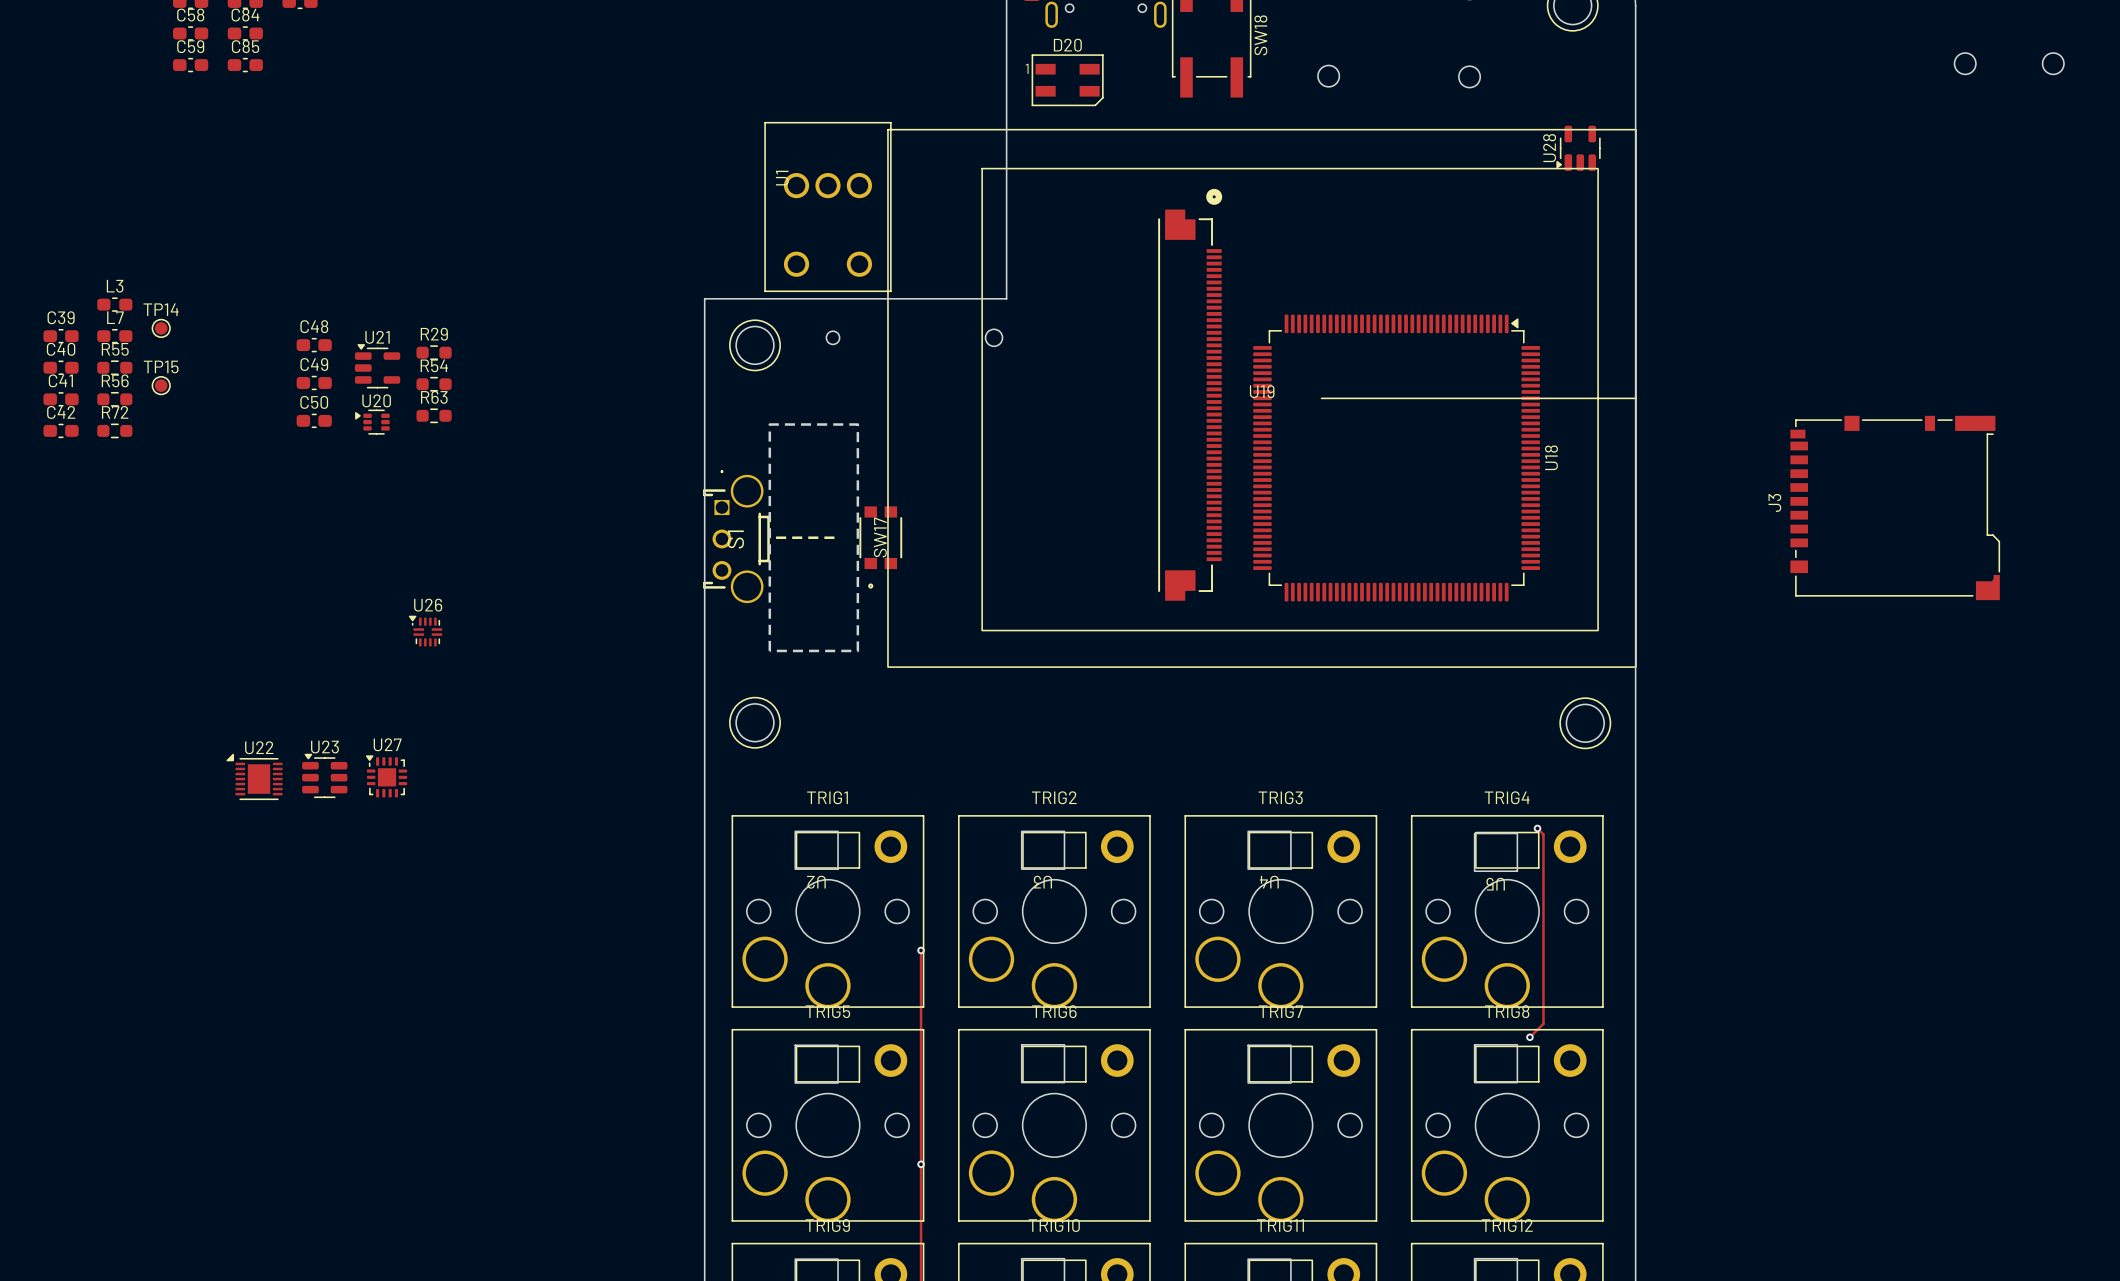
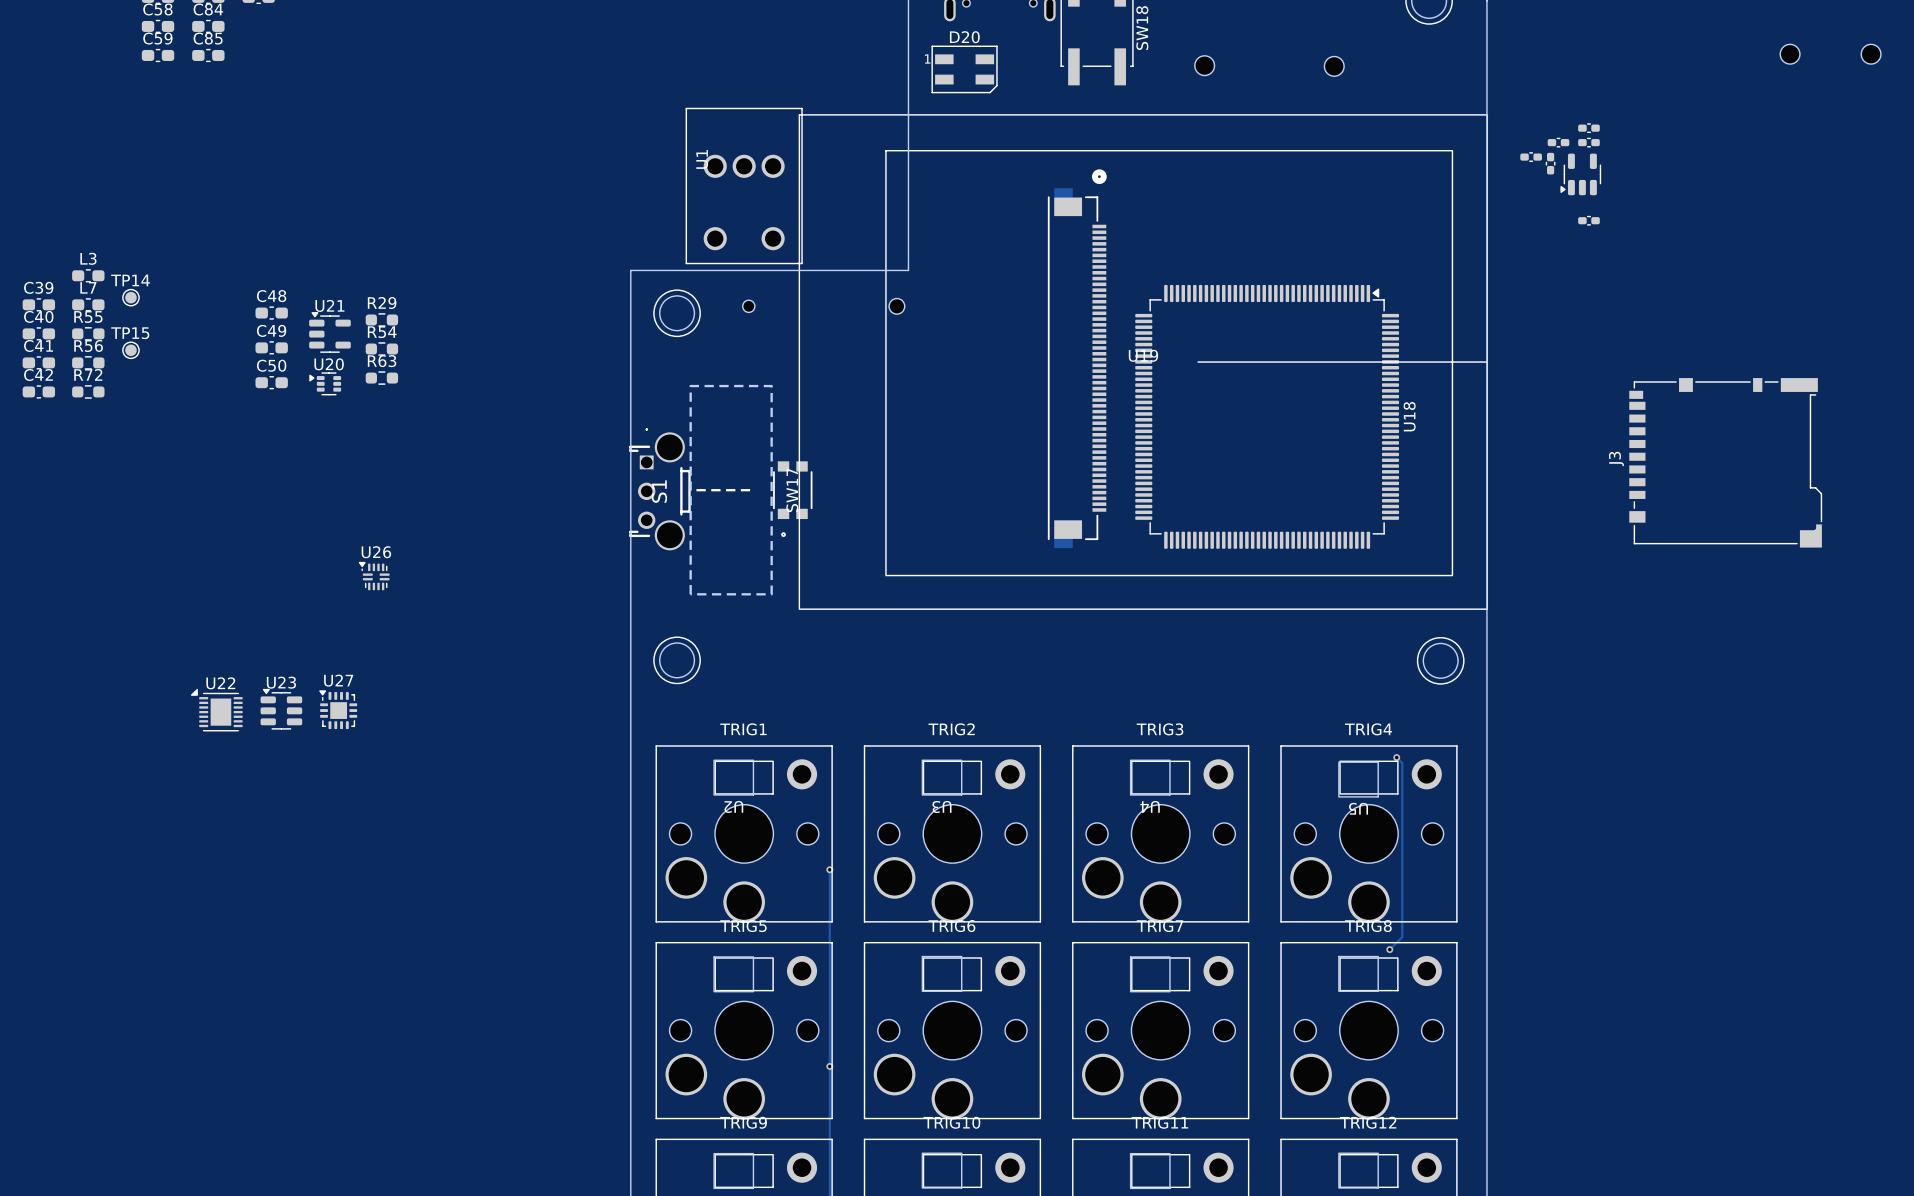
part: none -> (1588, 128)
U28: (1578, 148) -> none
part: none -> (1558, 142)
part: none -> (1588, 142)
part: none -> (1531, 157)
part: none -> (1550, 163)
part: none -> (1580, 174)
part: none -> (1588, 220)

